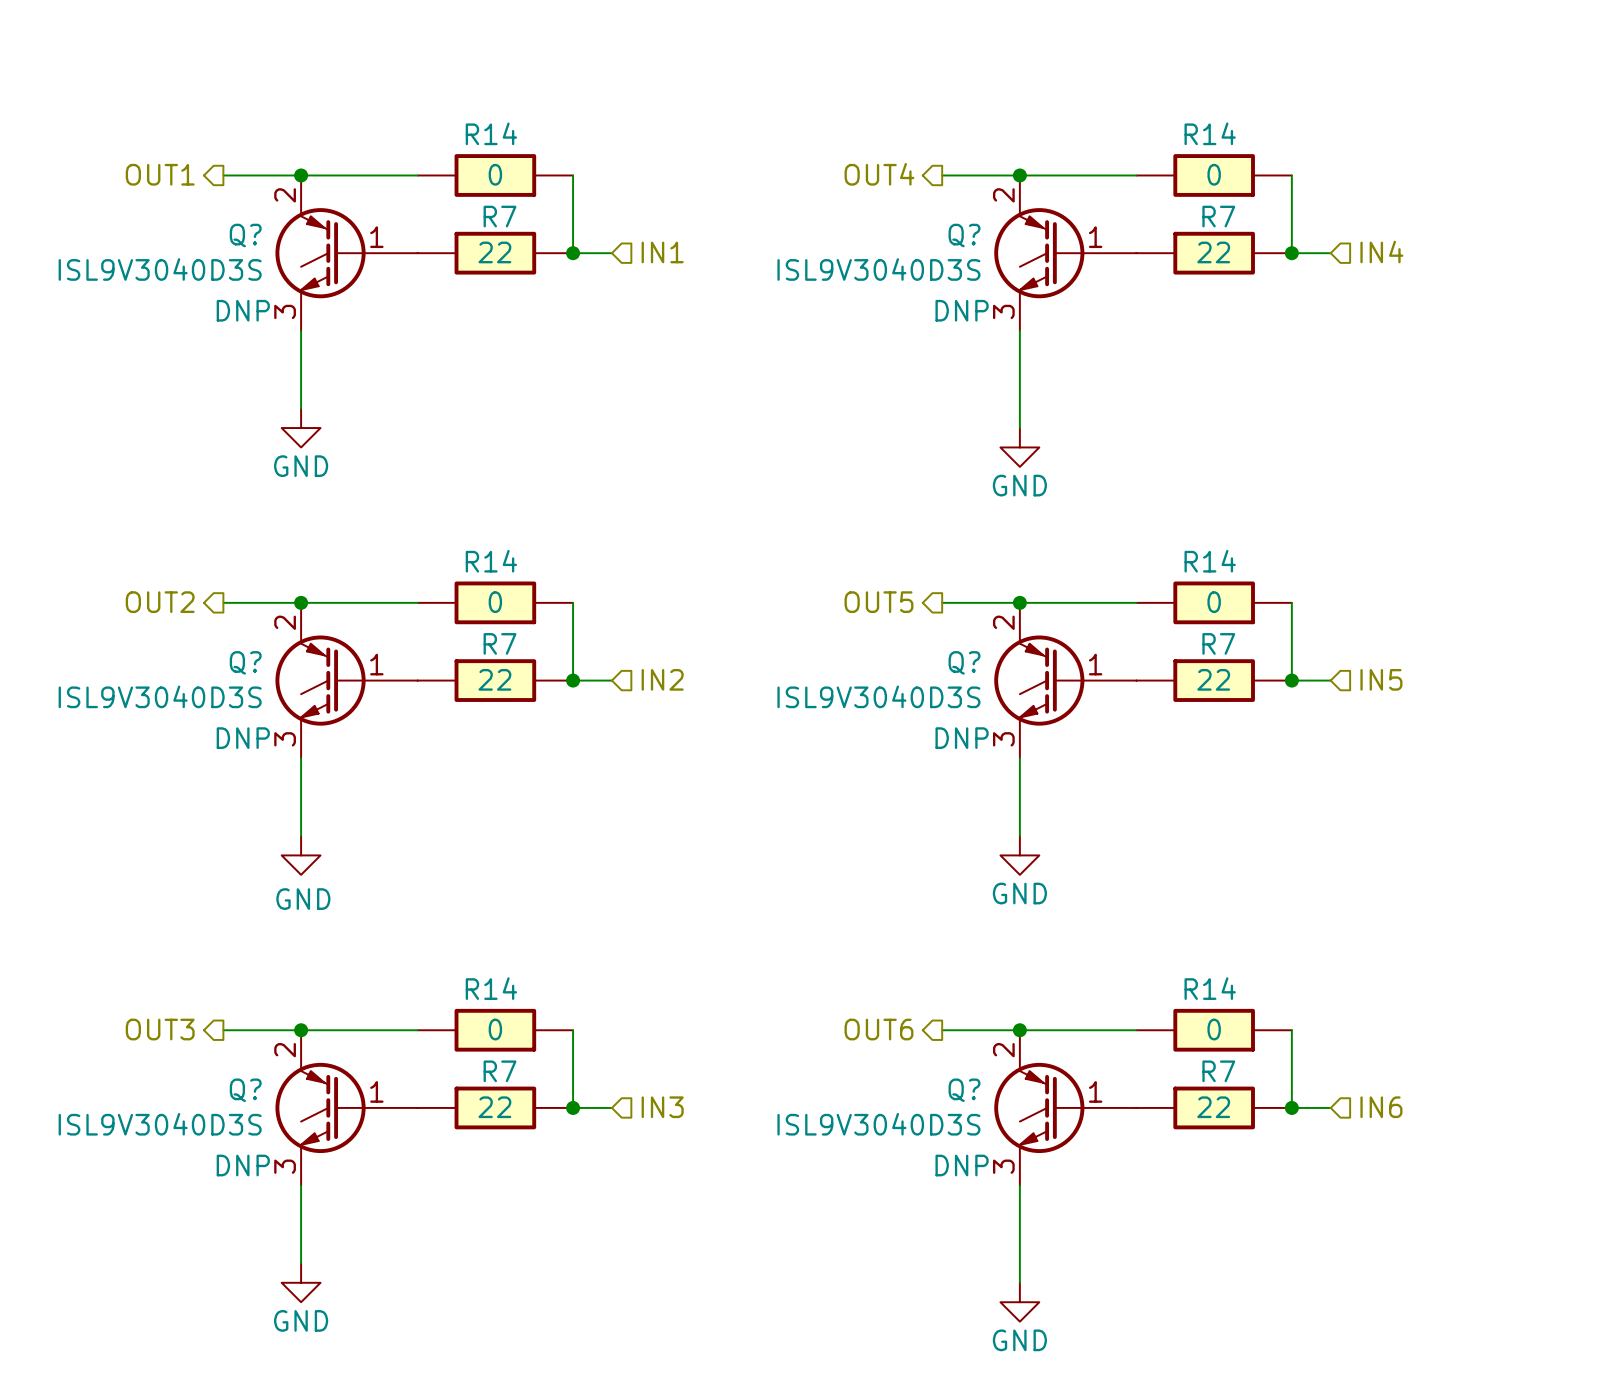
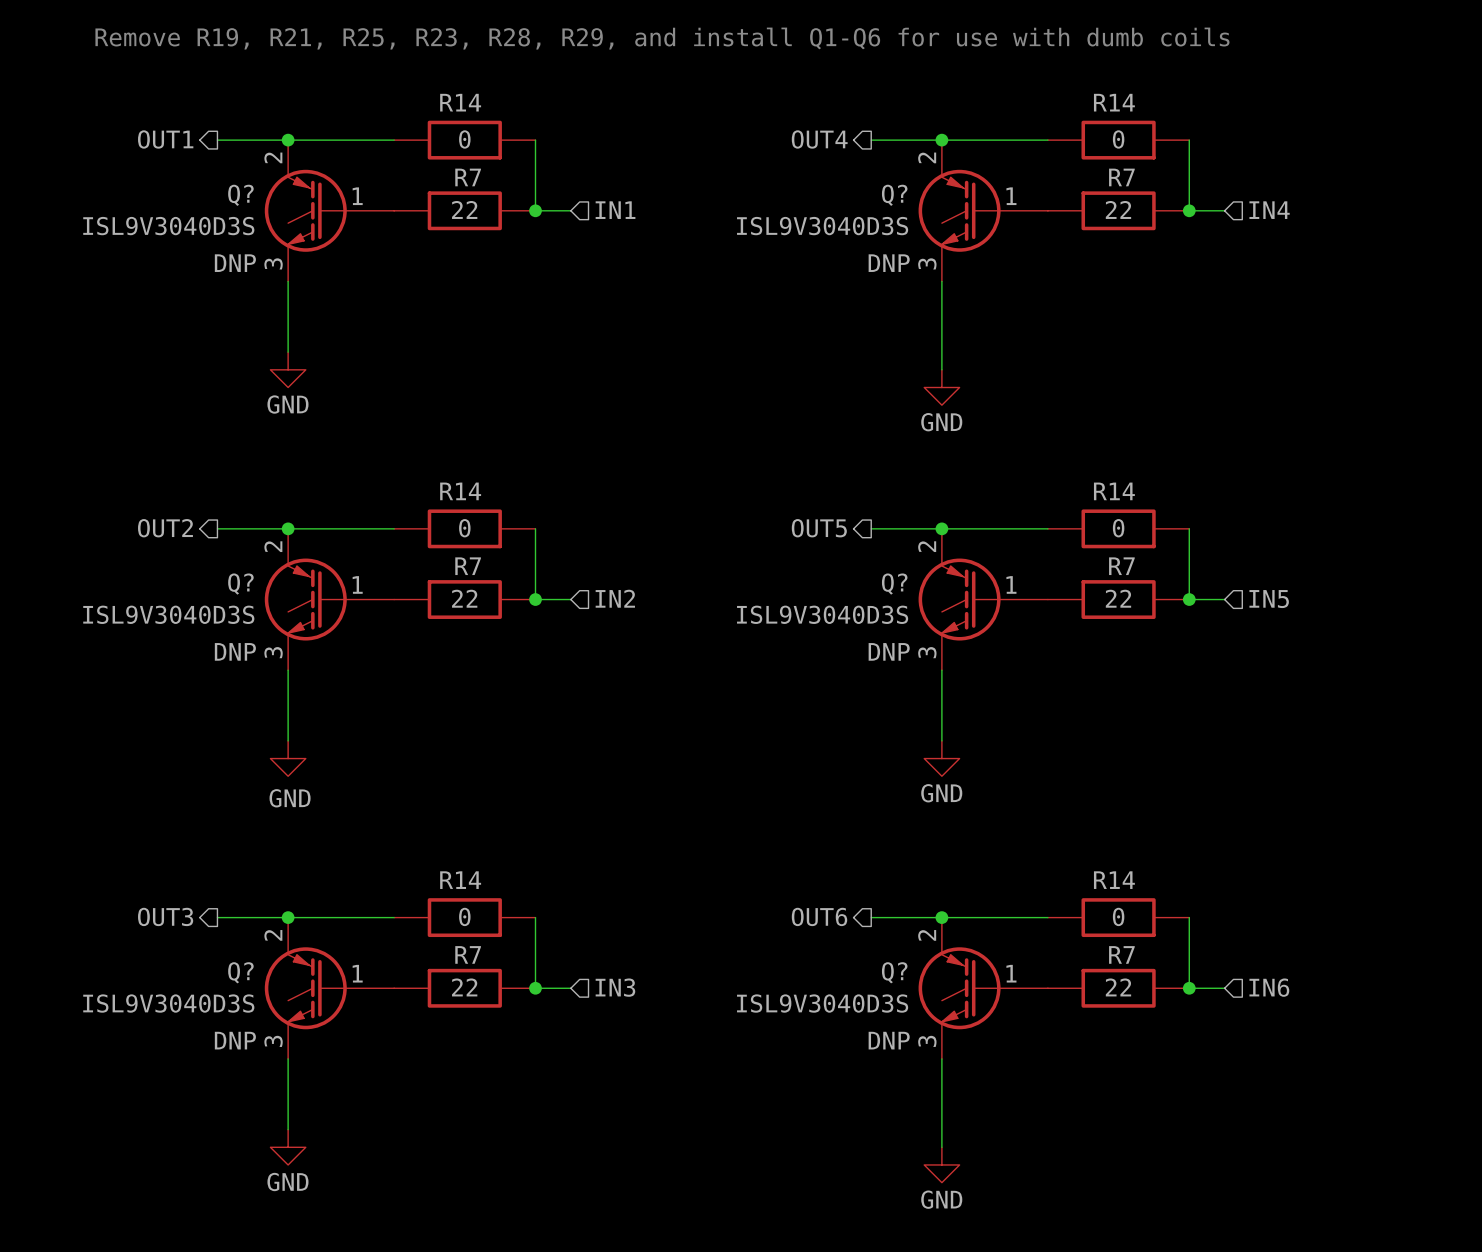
text: none -> Remove R19, R21, R25, R23, R28, R29, and install Q1-Q6 for use with dumb coils (662, 38)

